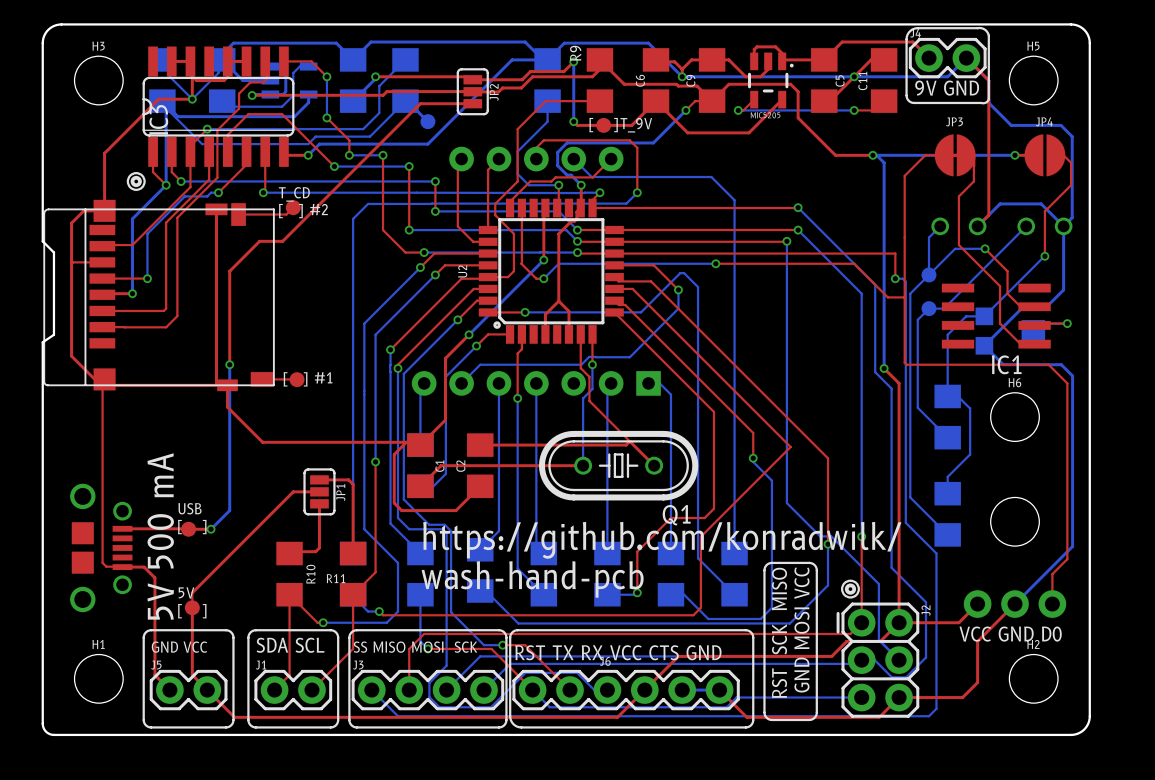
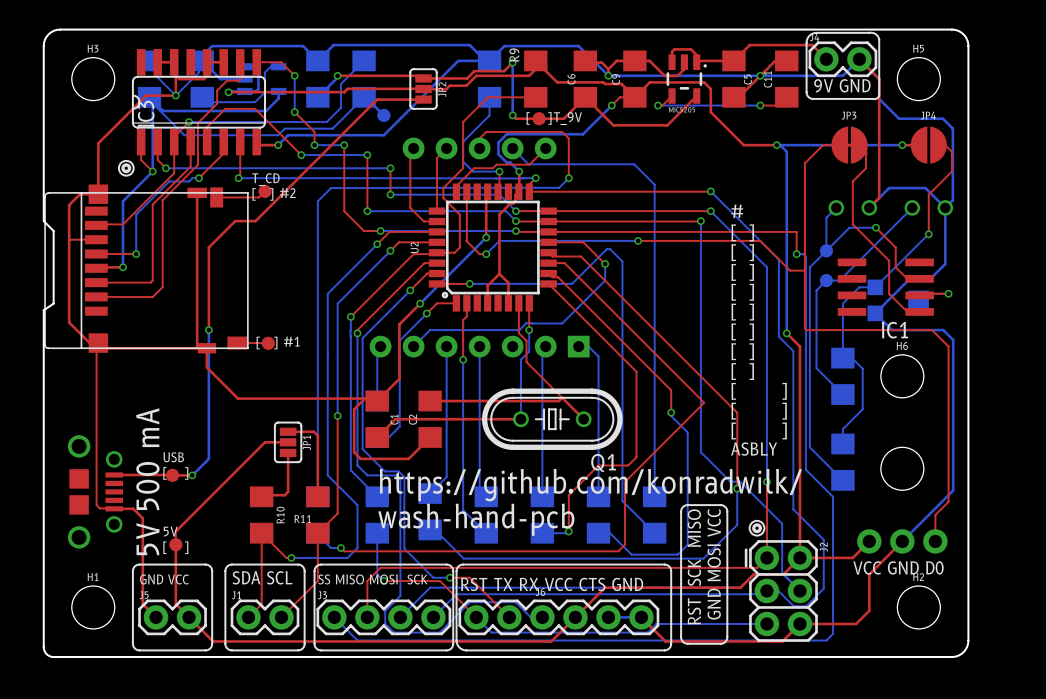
text: none -> # (737, 211)
text: none -> [ ] (742, 232)
text: none -> [ ] (742, 252)
text: none -> [ ] (742, 272)
text: none -> [ ] (742, 292)
text: none -> [ ] (742, 312)
text: none -> [ ] (742, 331)
text: none -> [ ] (742, 351)
text: none -> [ ] (742, 371)
text: none -> [ ] (759, 391)
text: none -> [ ] (759, 411)
text: none -> [ ] (759, 430)
text: none -> ASBLY (754, 449)

